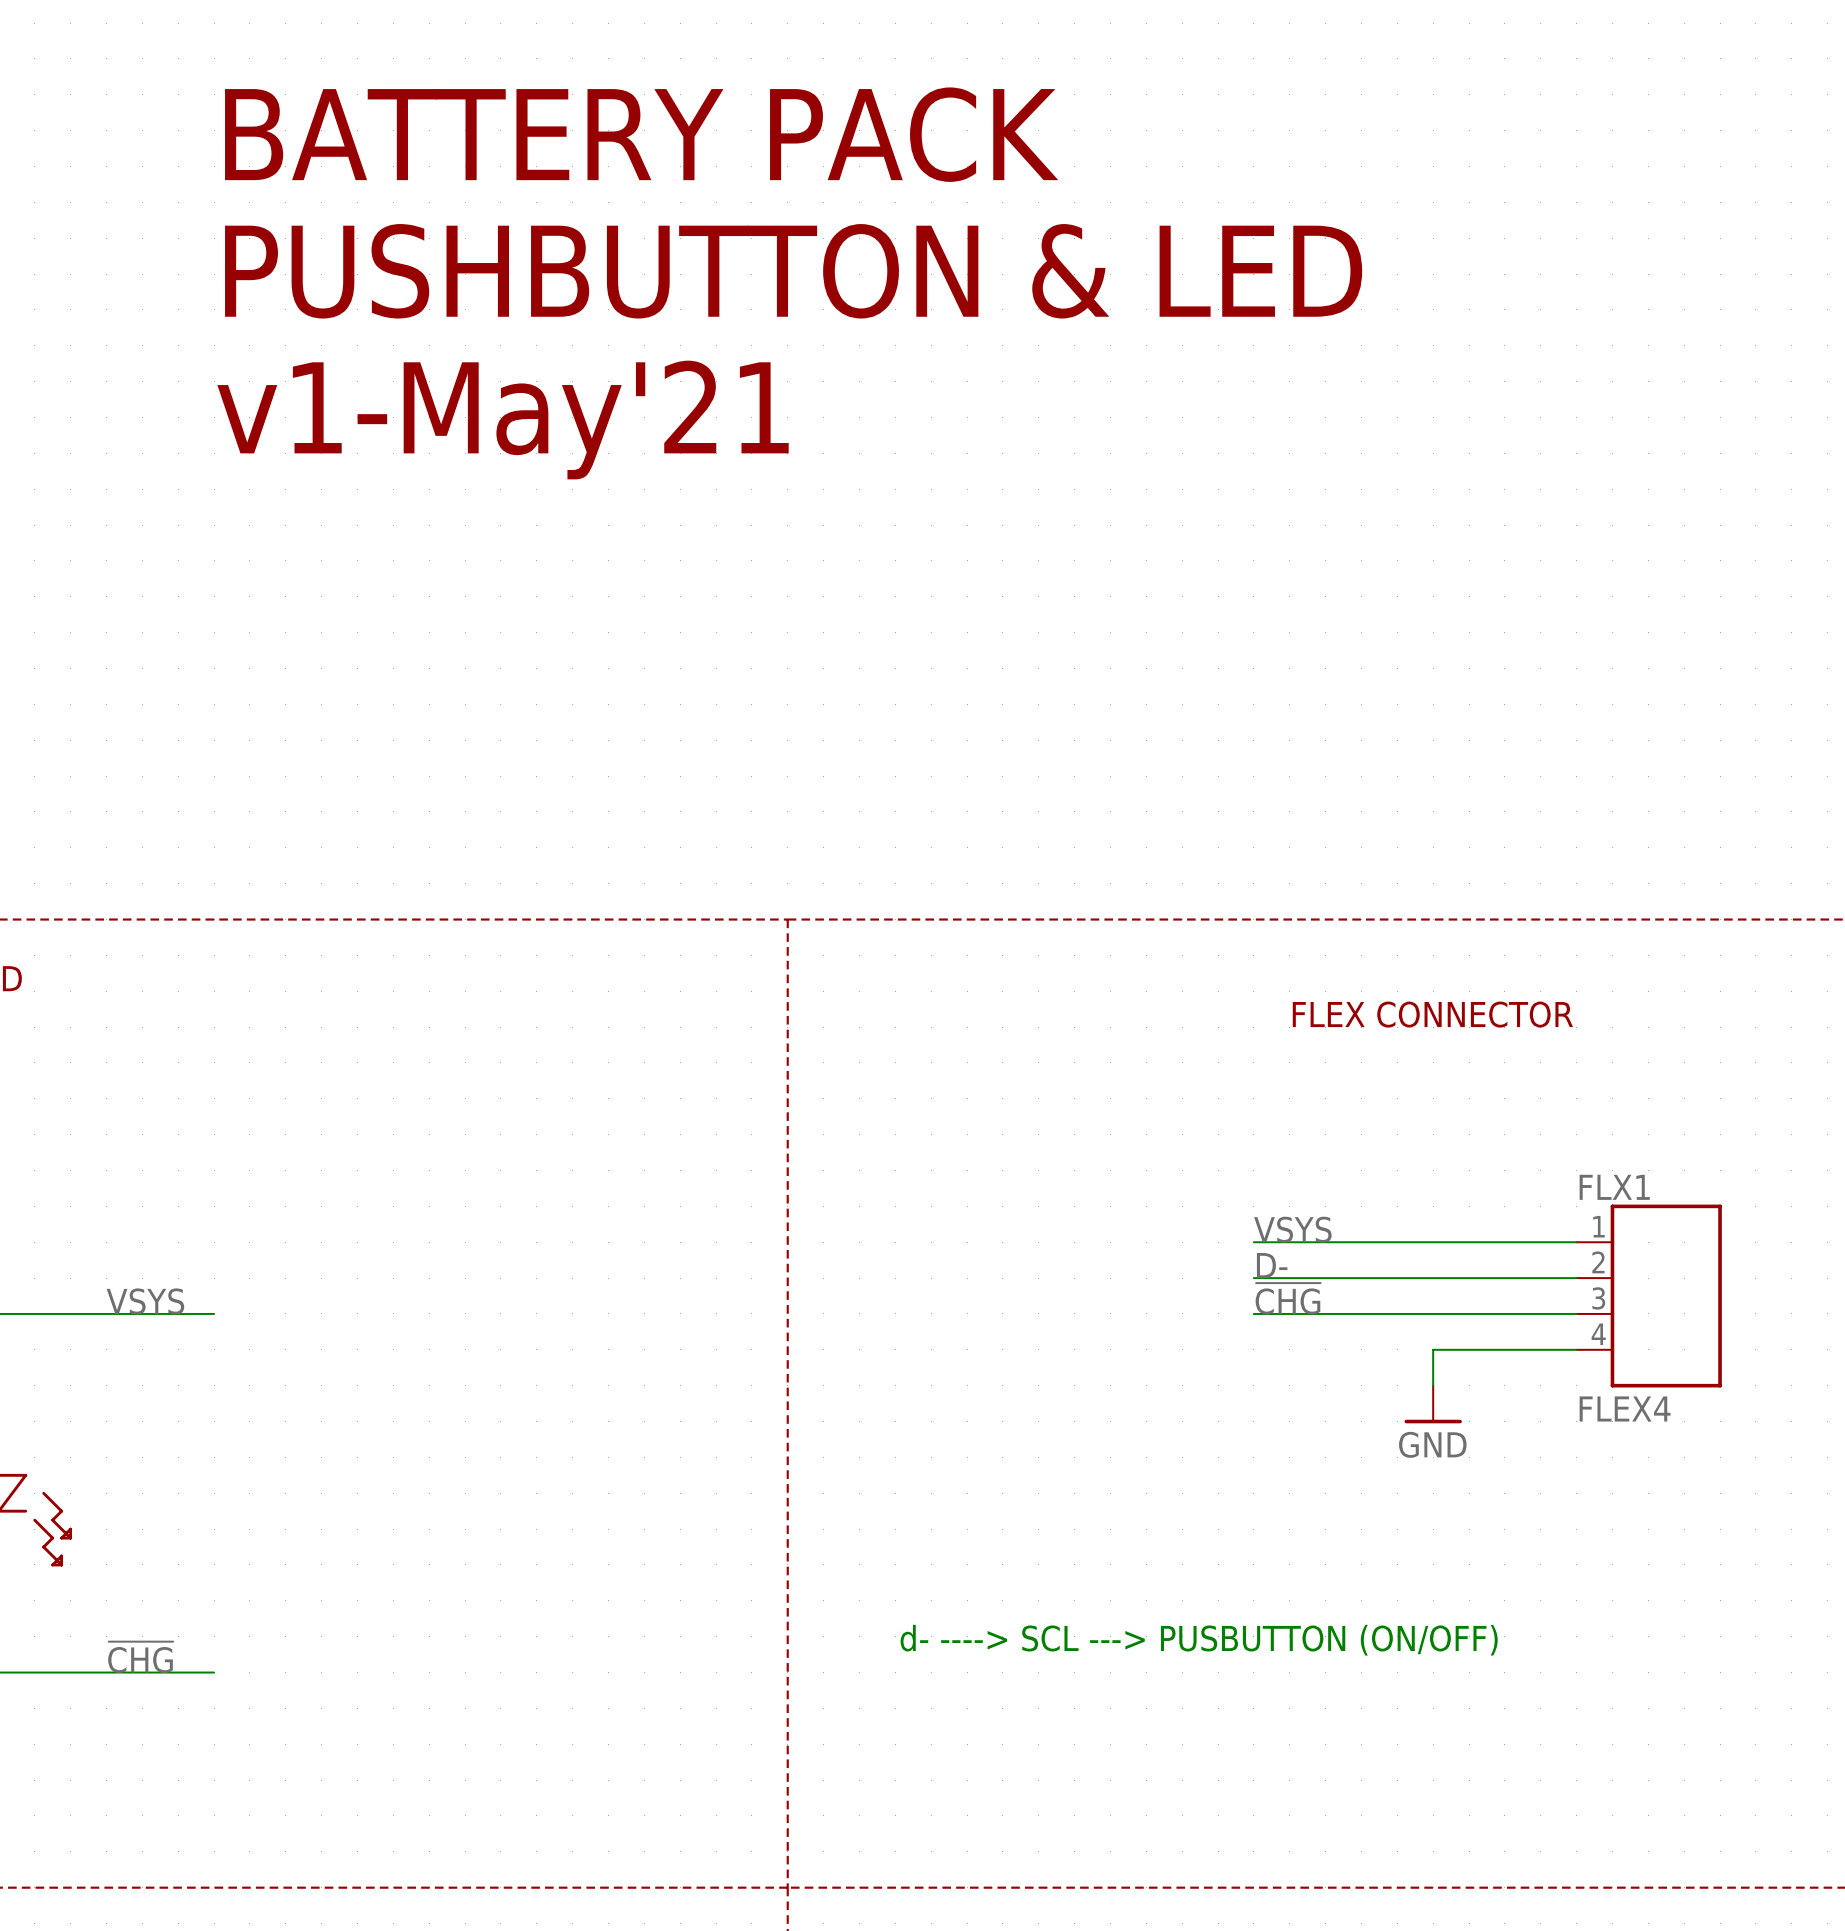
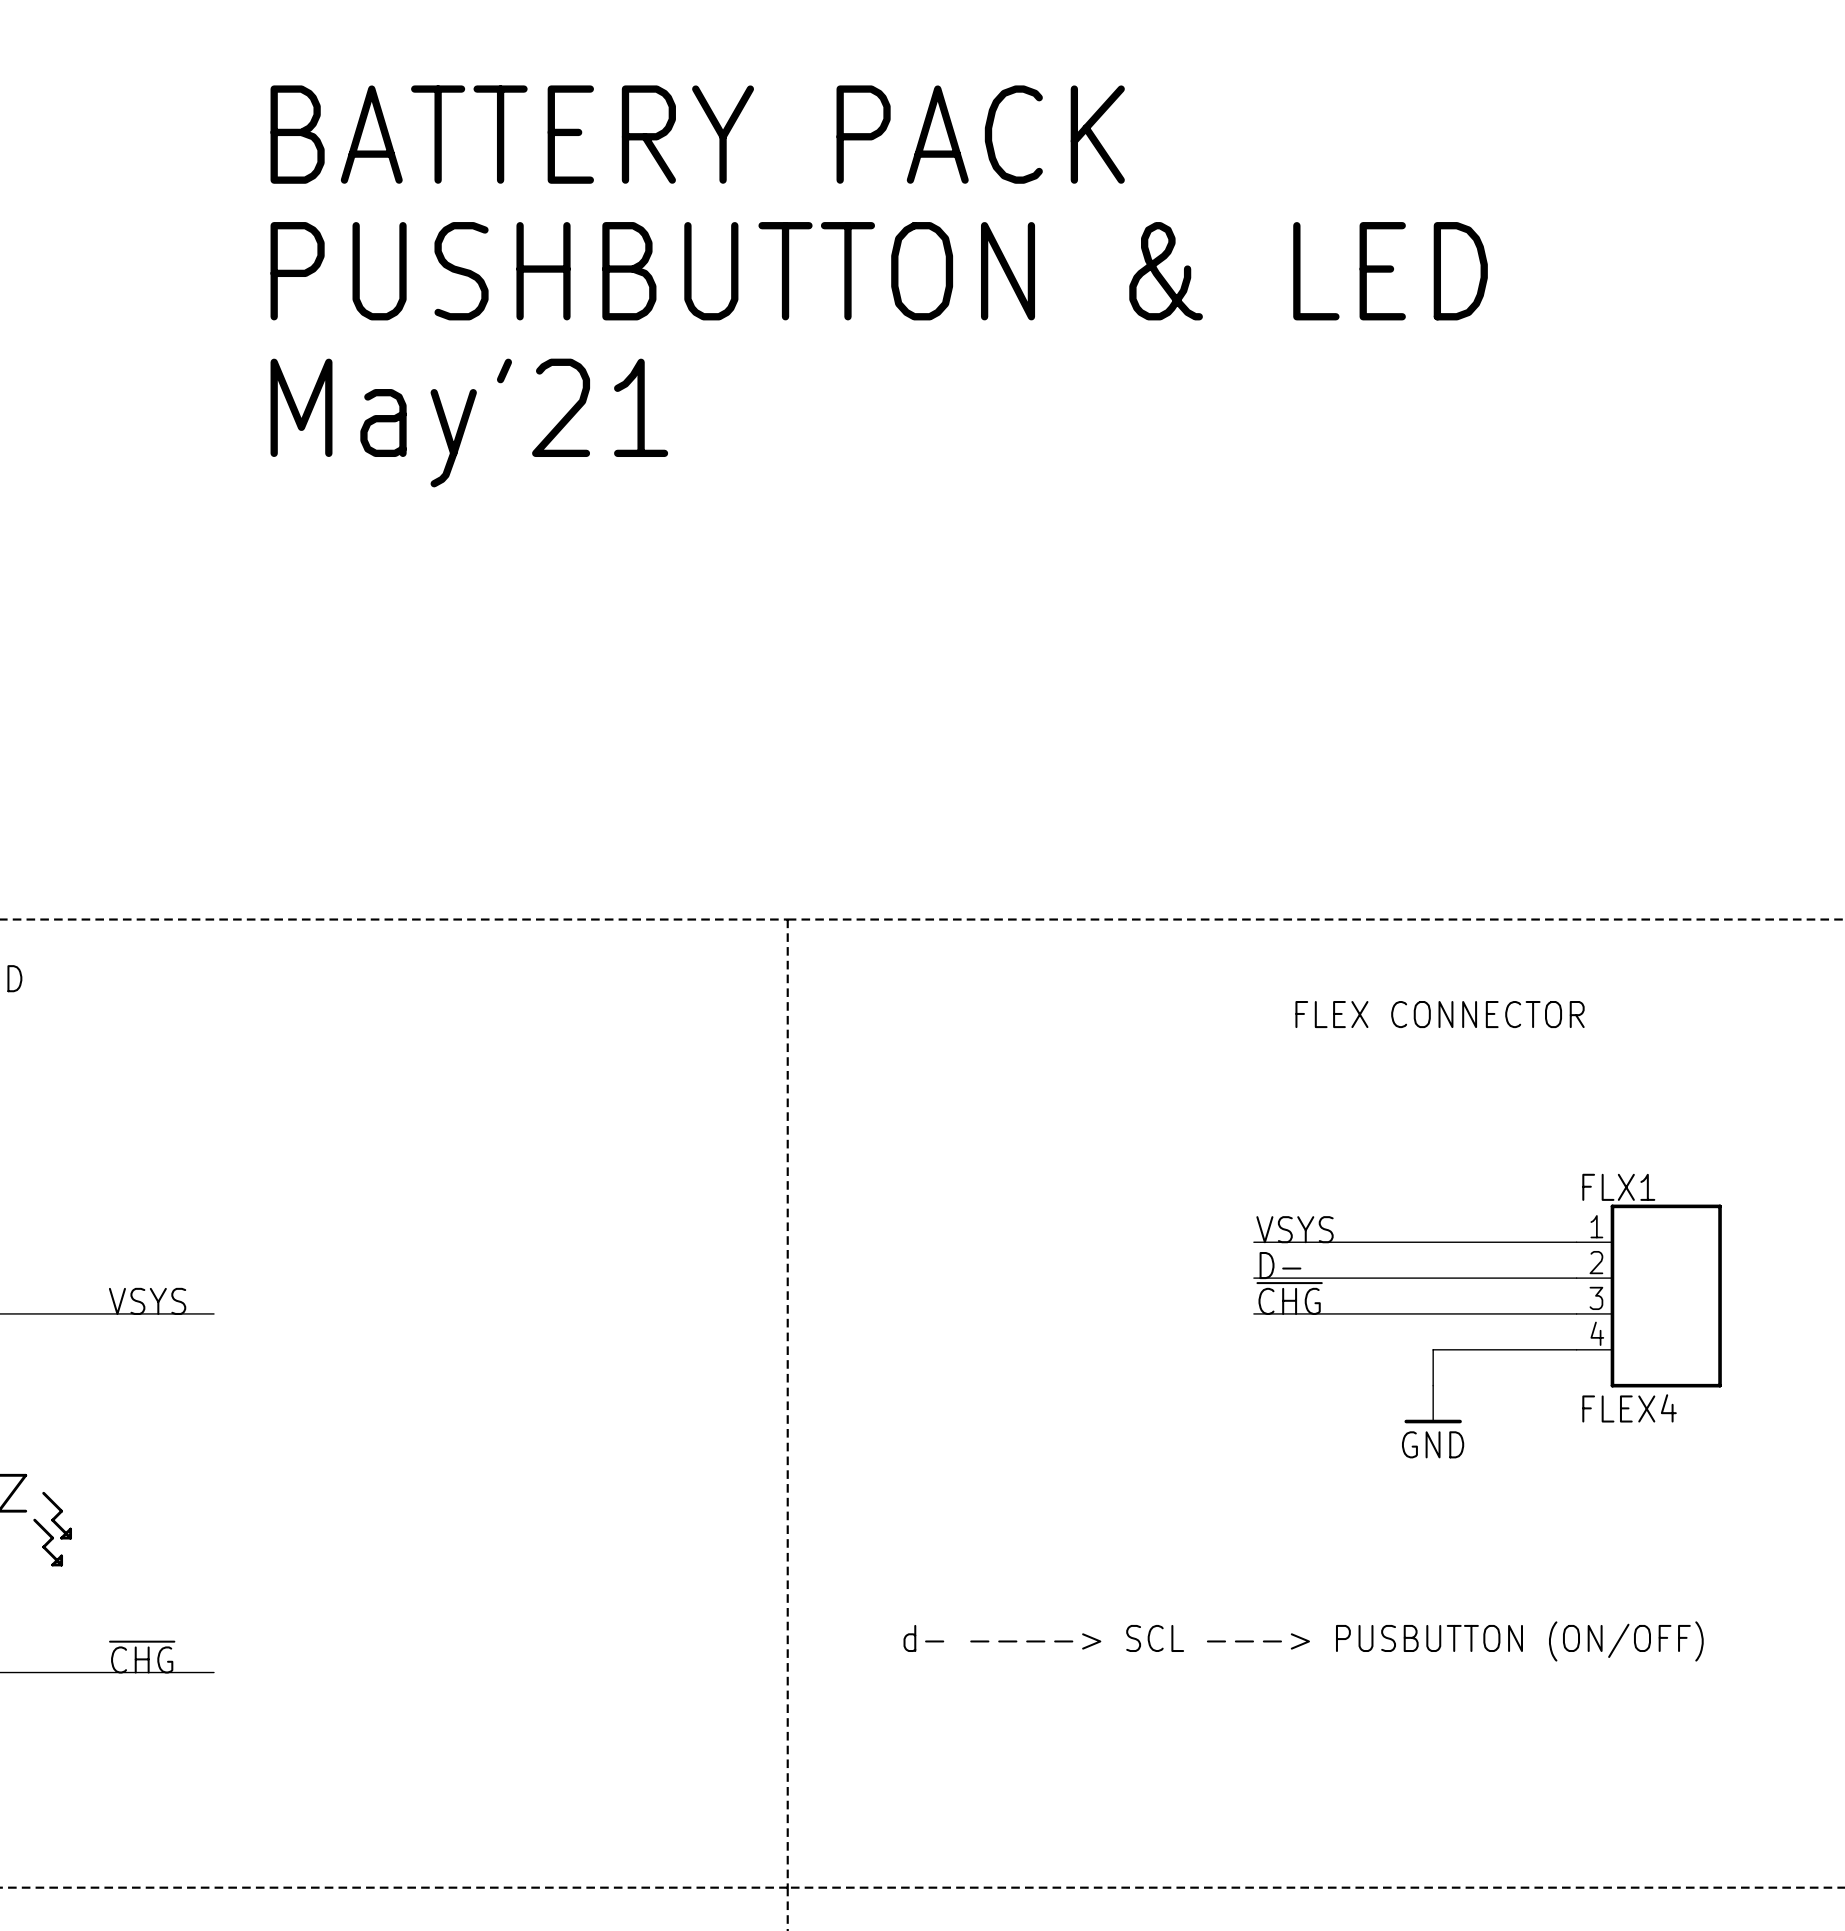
text position: BATTERY PACK (641, 134) -> BATTERY PACK (697, 134)
text position: PUSHBUTTON & LED (793, 271) -> PUSHBUTTON & LED (879, 271)
text: v1-May'21 (503, 420) -> May'21 (469, 423)

